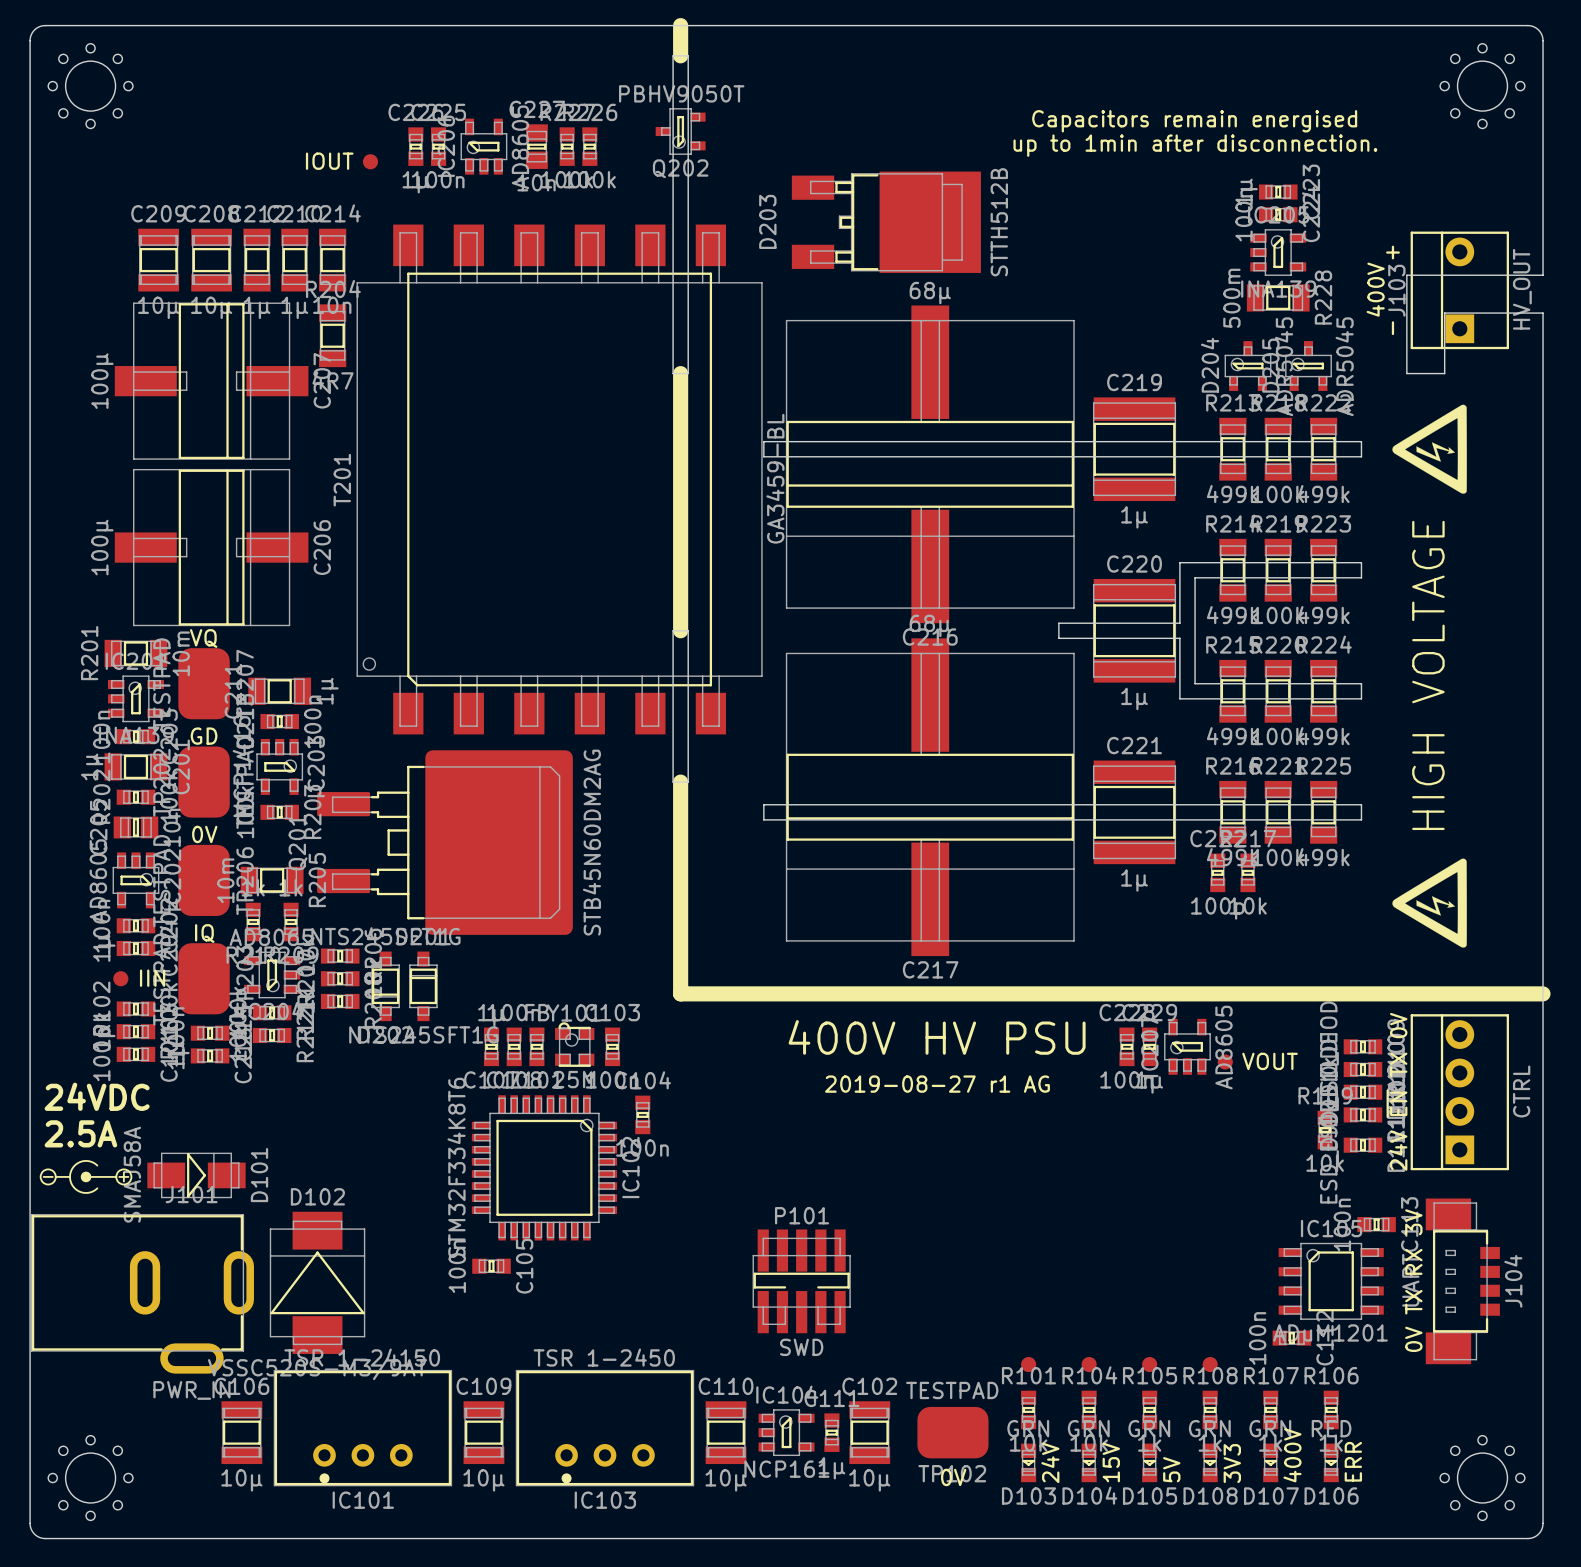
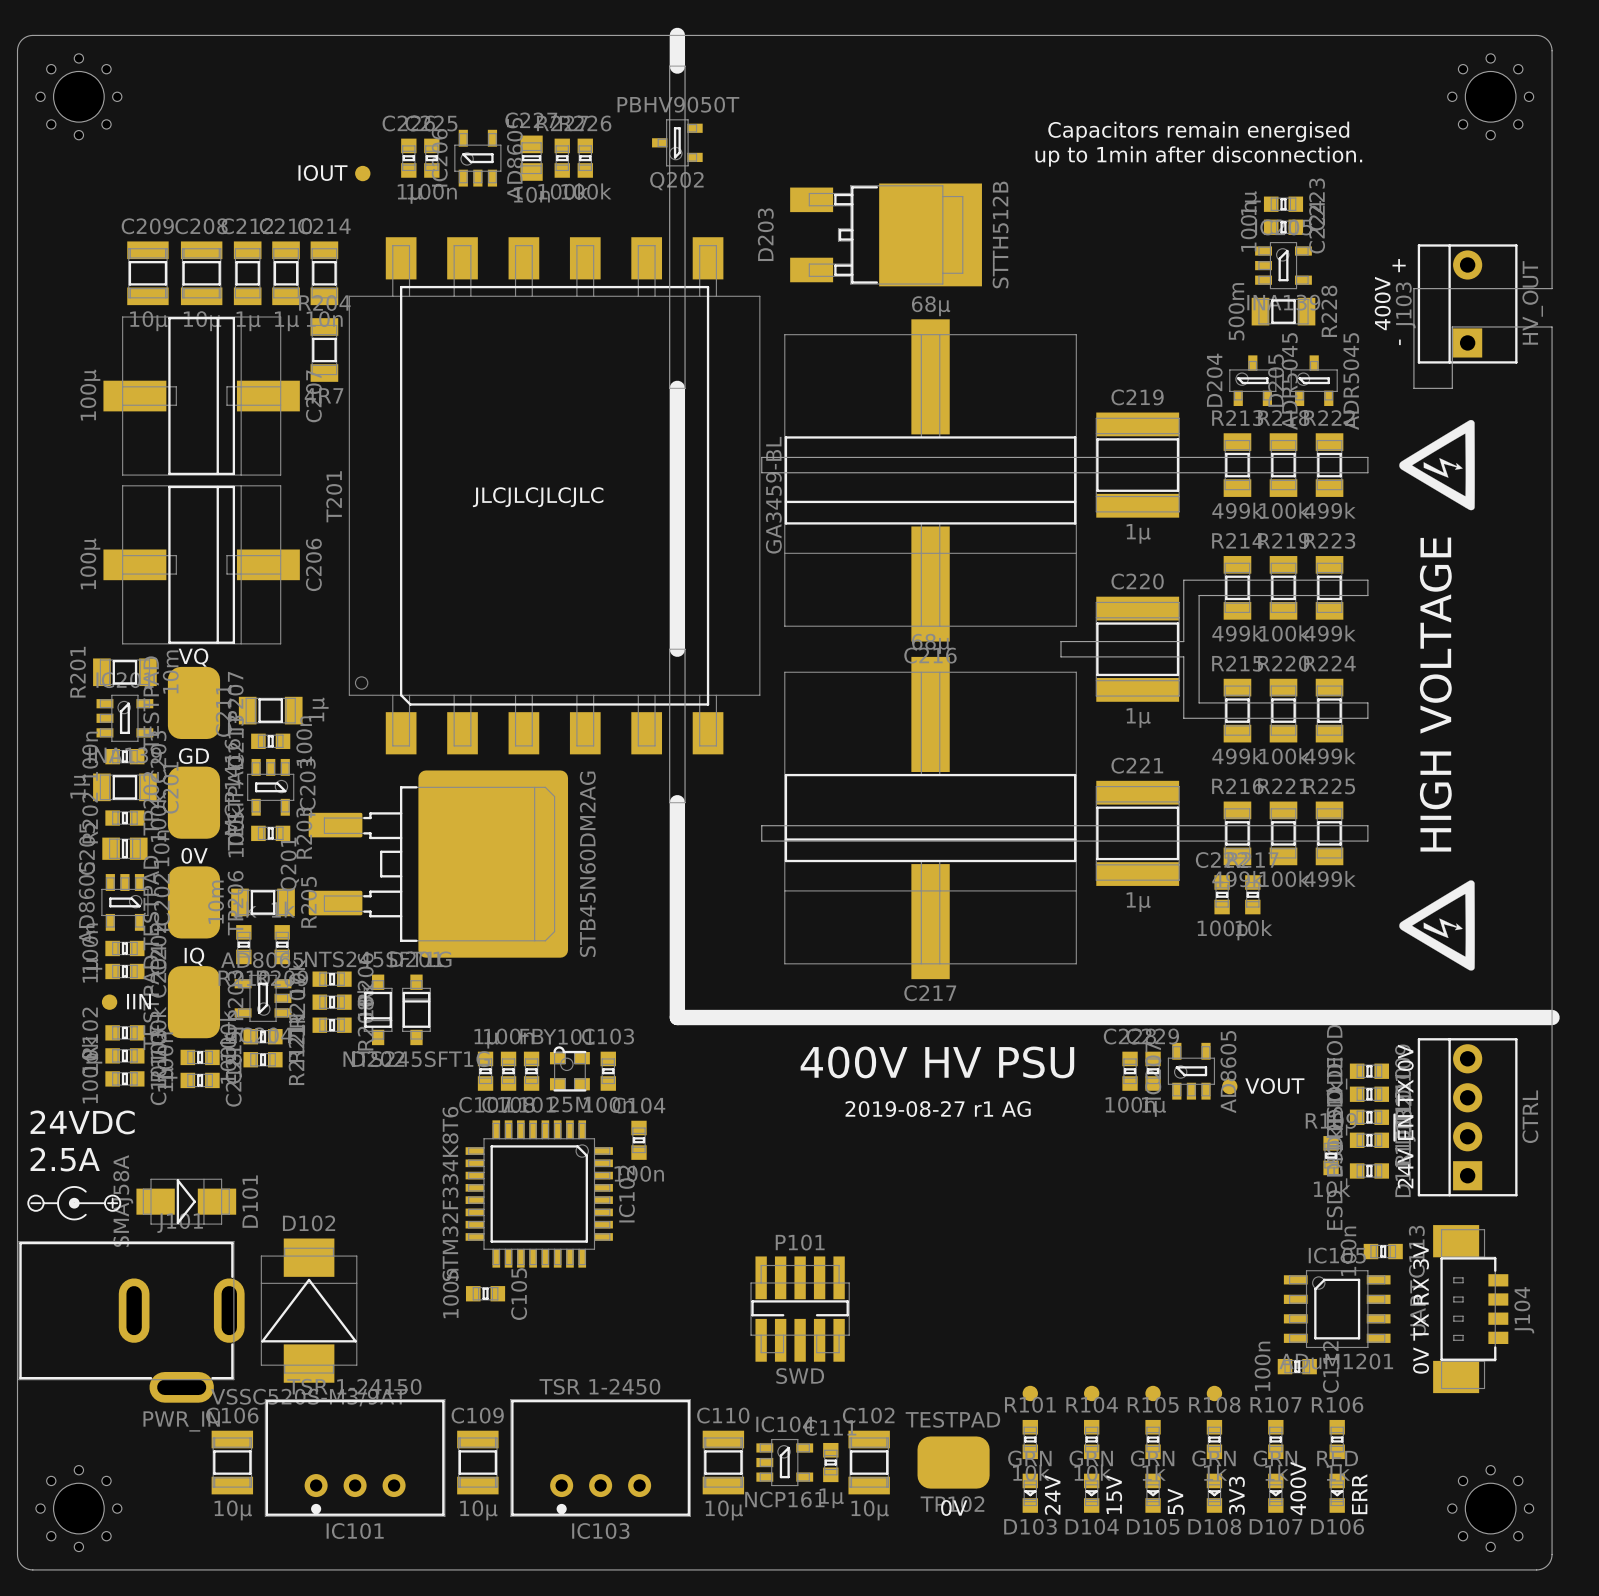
text: none -> JLCJLCJLCJLC (538, 497)

